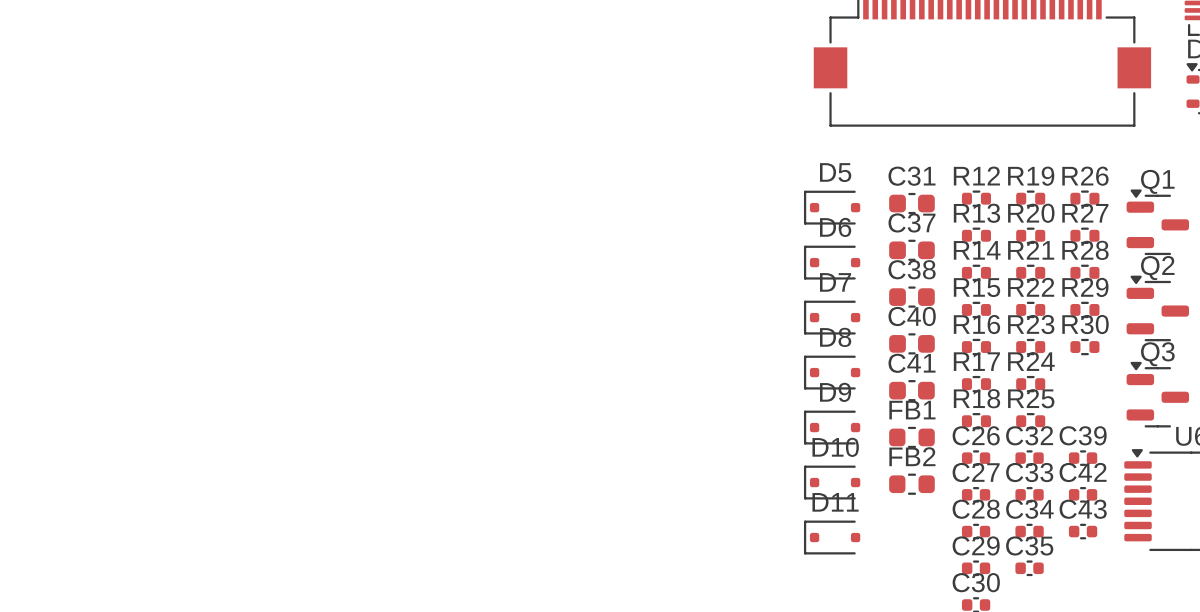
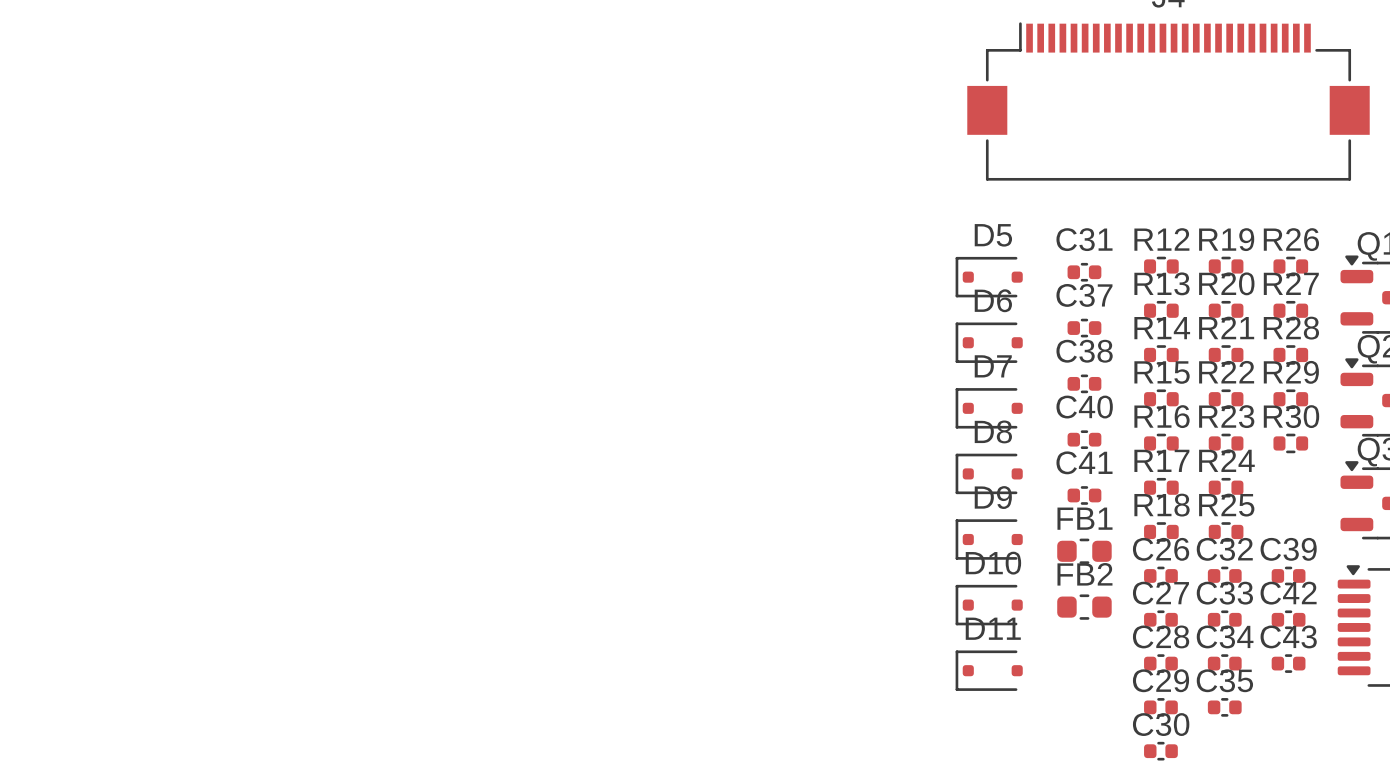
C31 footprint: [889, 192, 935, 215] -> [1067, 262, 1102, 282]
C37 footprint: [889, 239, 935, 261] -> [1067, 318, 1102, 338]
C38 footprint: [889, 286, 935, 308] -> [1067, 374, 1102, 394]
C40 footprint: [889, 333, 935, 355] -> [1067, 430, 1102, 450]
C41 footprint: [889, 380, 935, 402] -> [1067, 486, 1102, 505]

